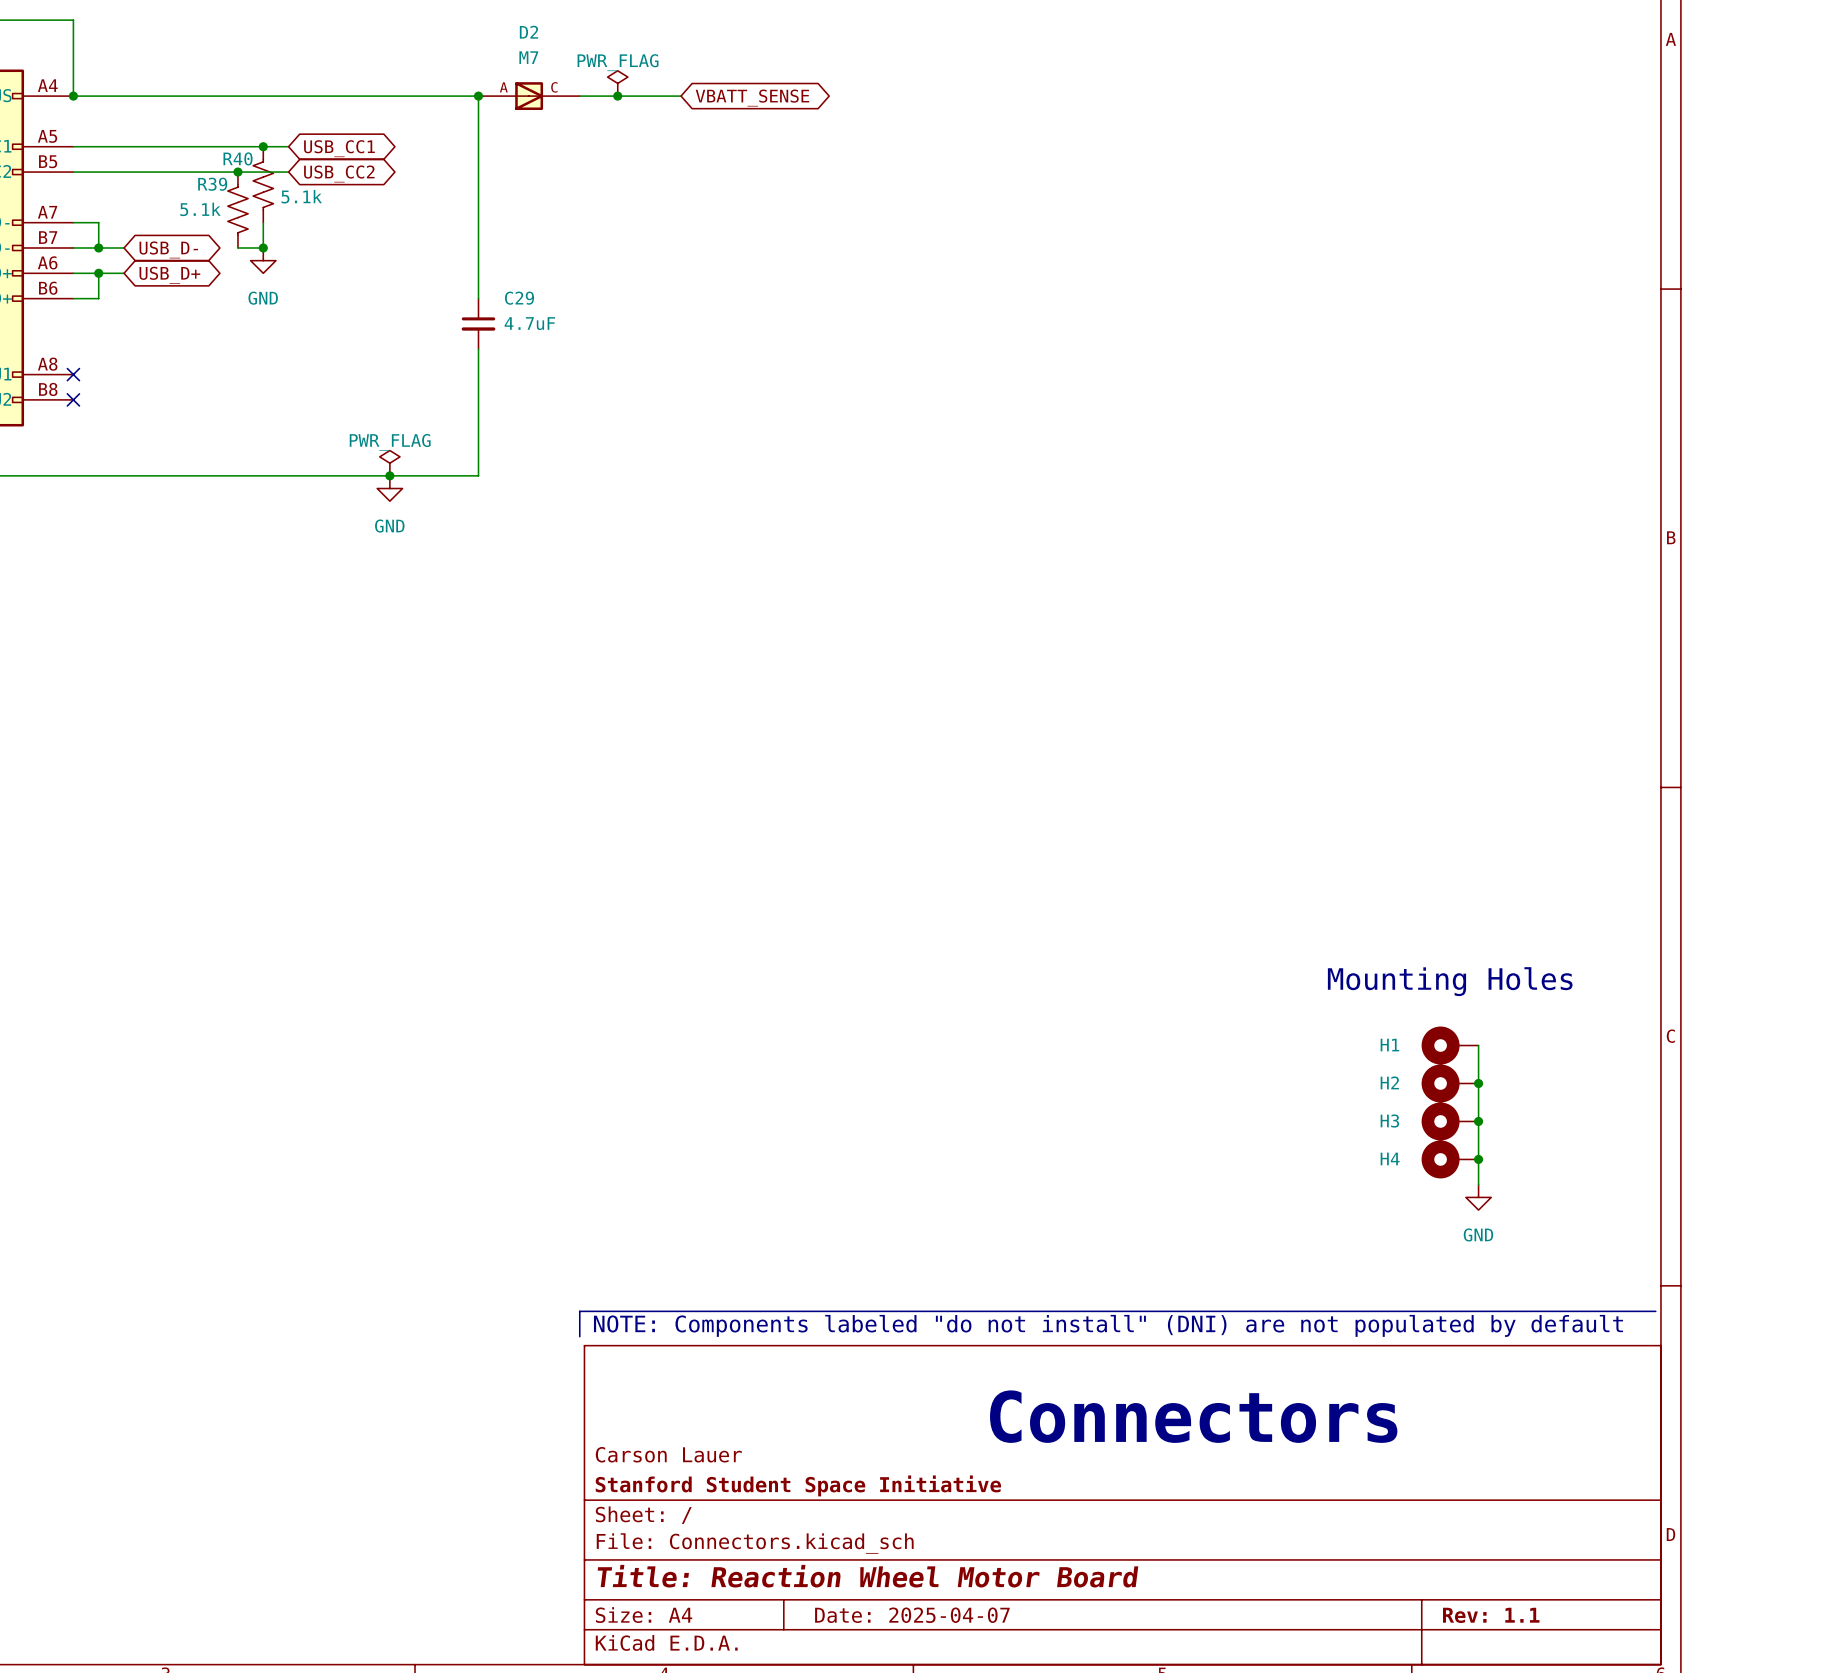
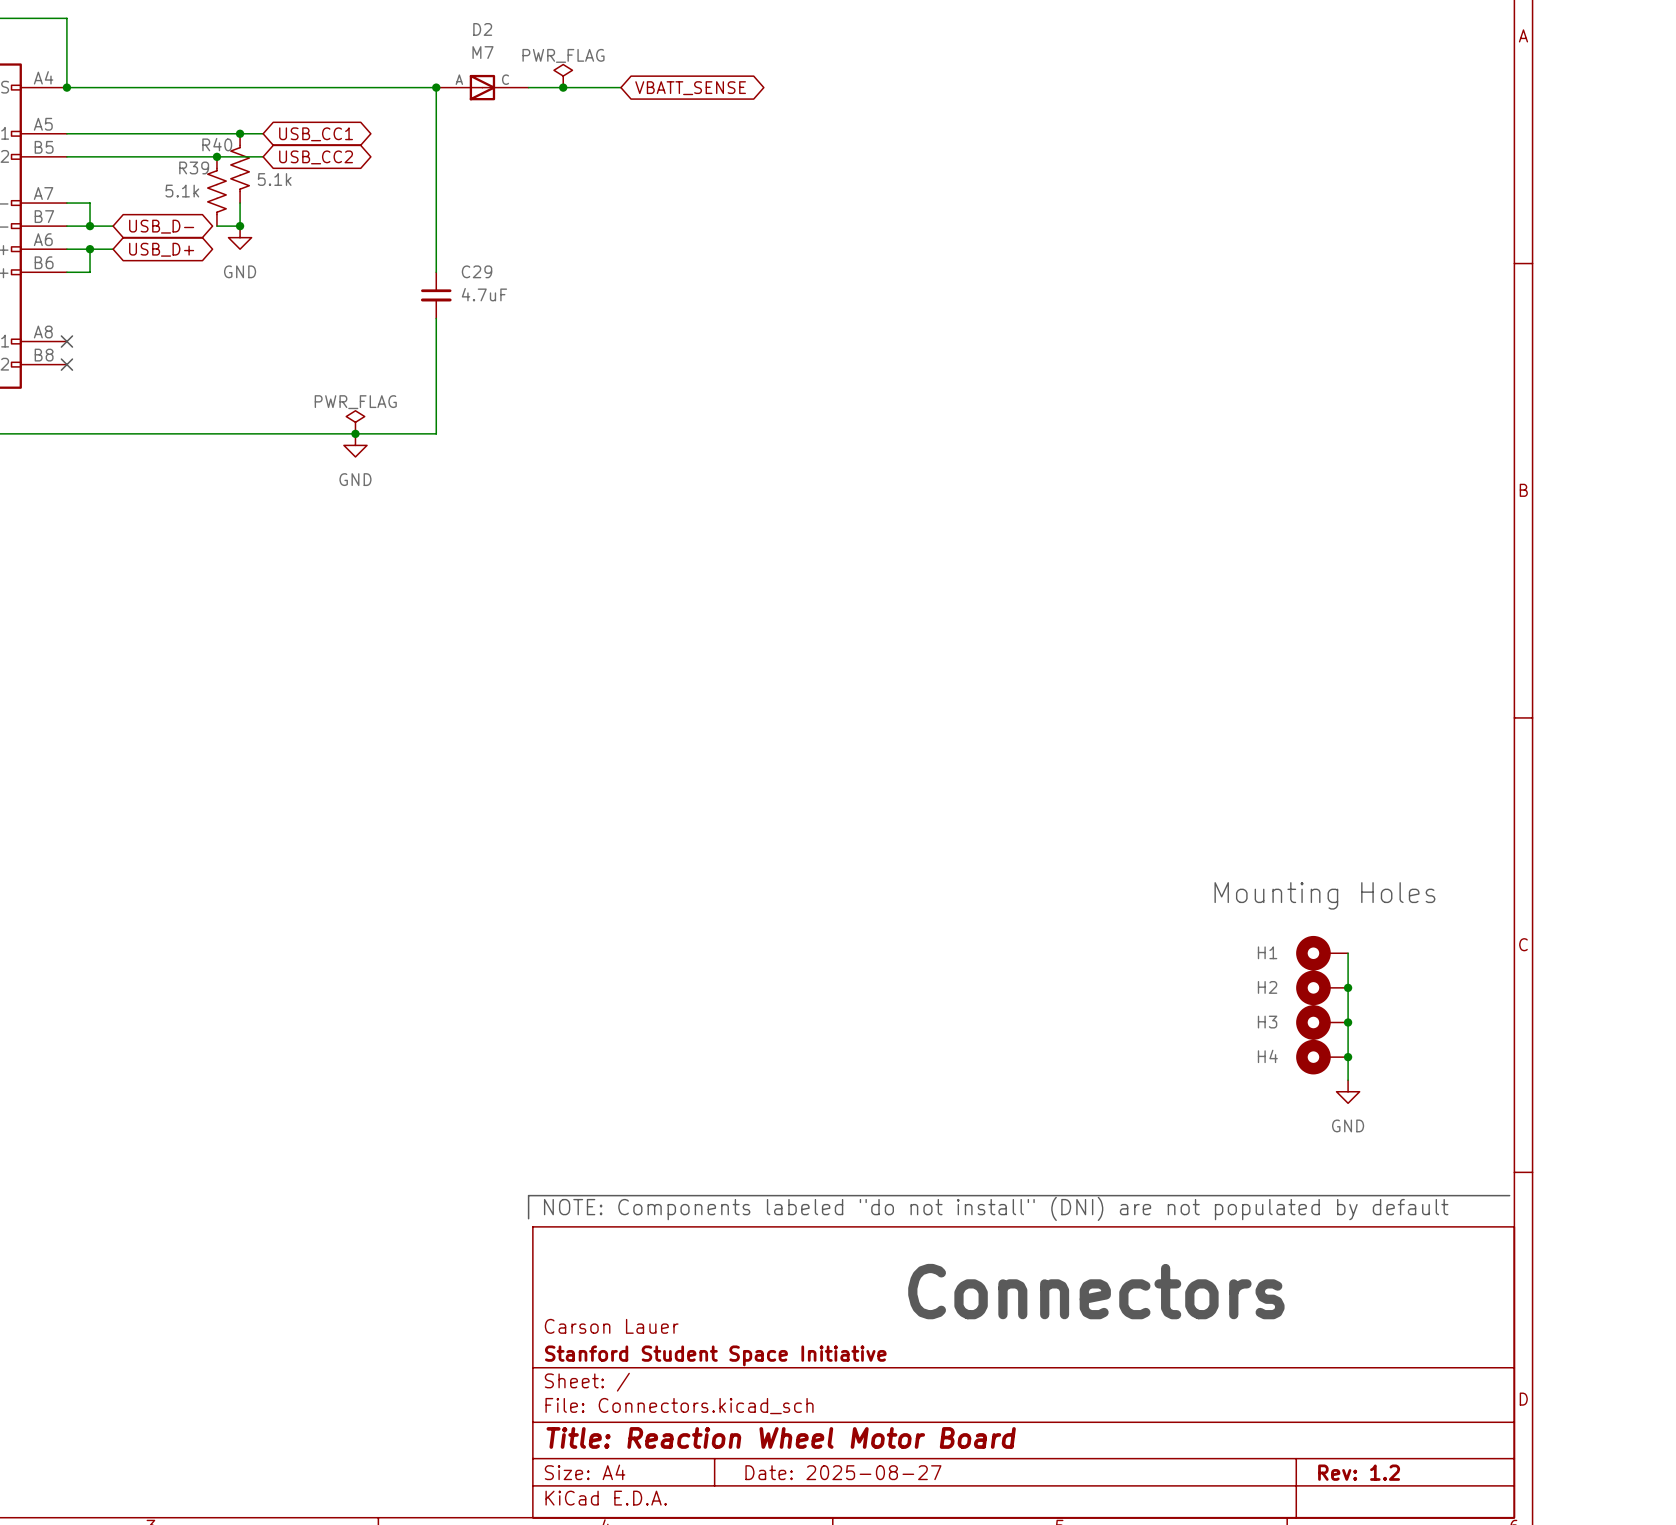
title block: Date: 2025-04-07 (912, 1615) -> Date: 2025-08-27 (843, 1472)
title block: Rev: 1.1 (1491, 1615) -> Rev: 1.2 (1359, 1472)

